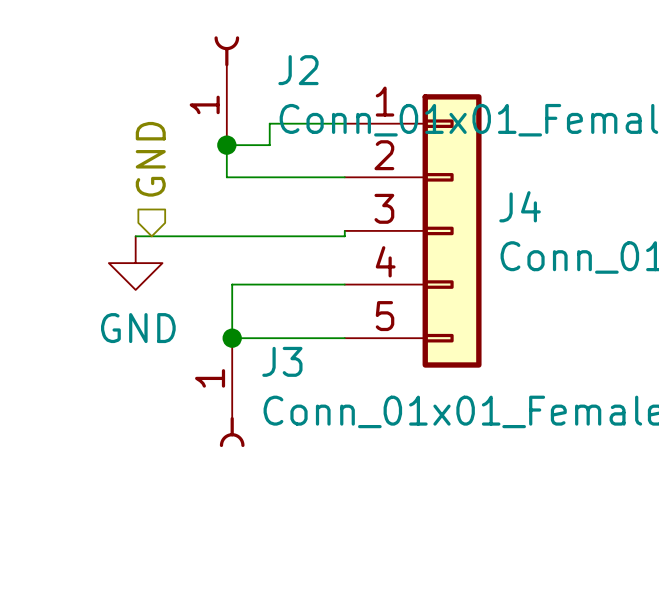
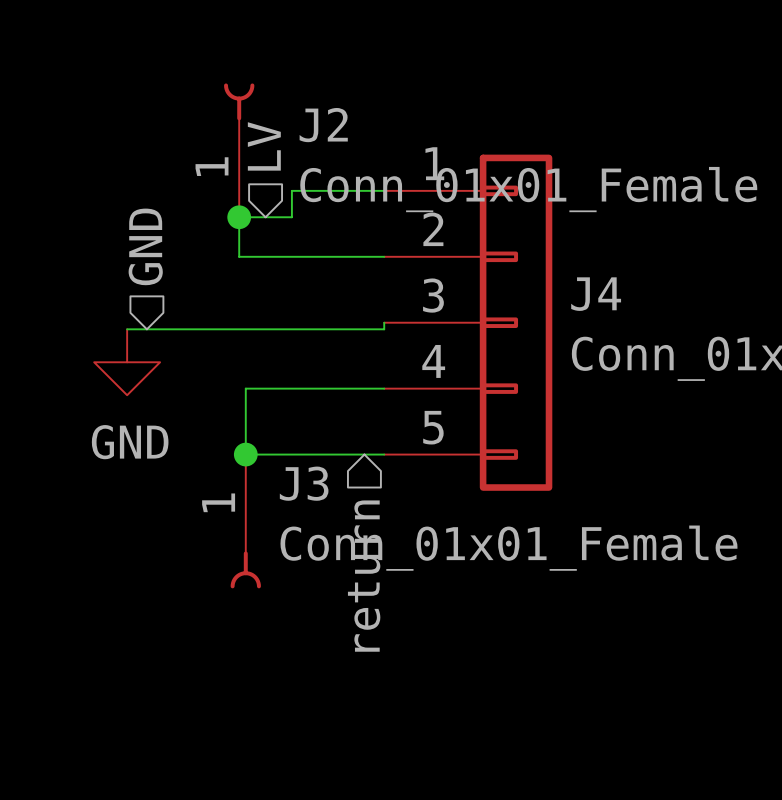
hierarchical label: none -> LV (264, 146)
hierarchical label: none -> return (364, 576)

